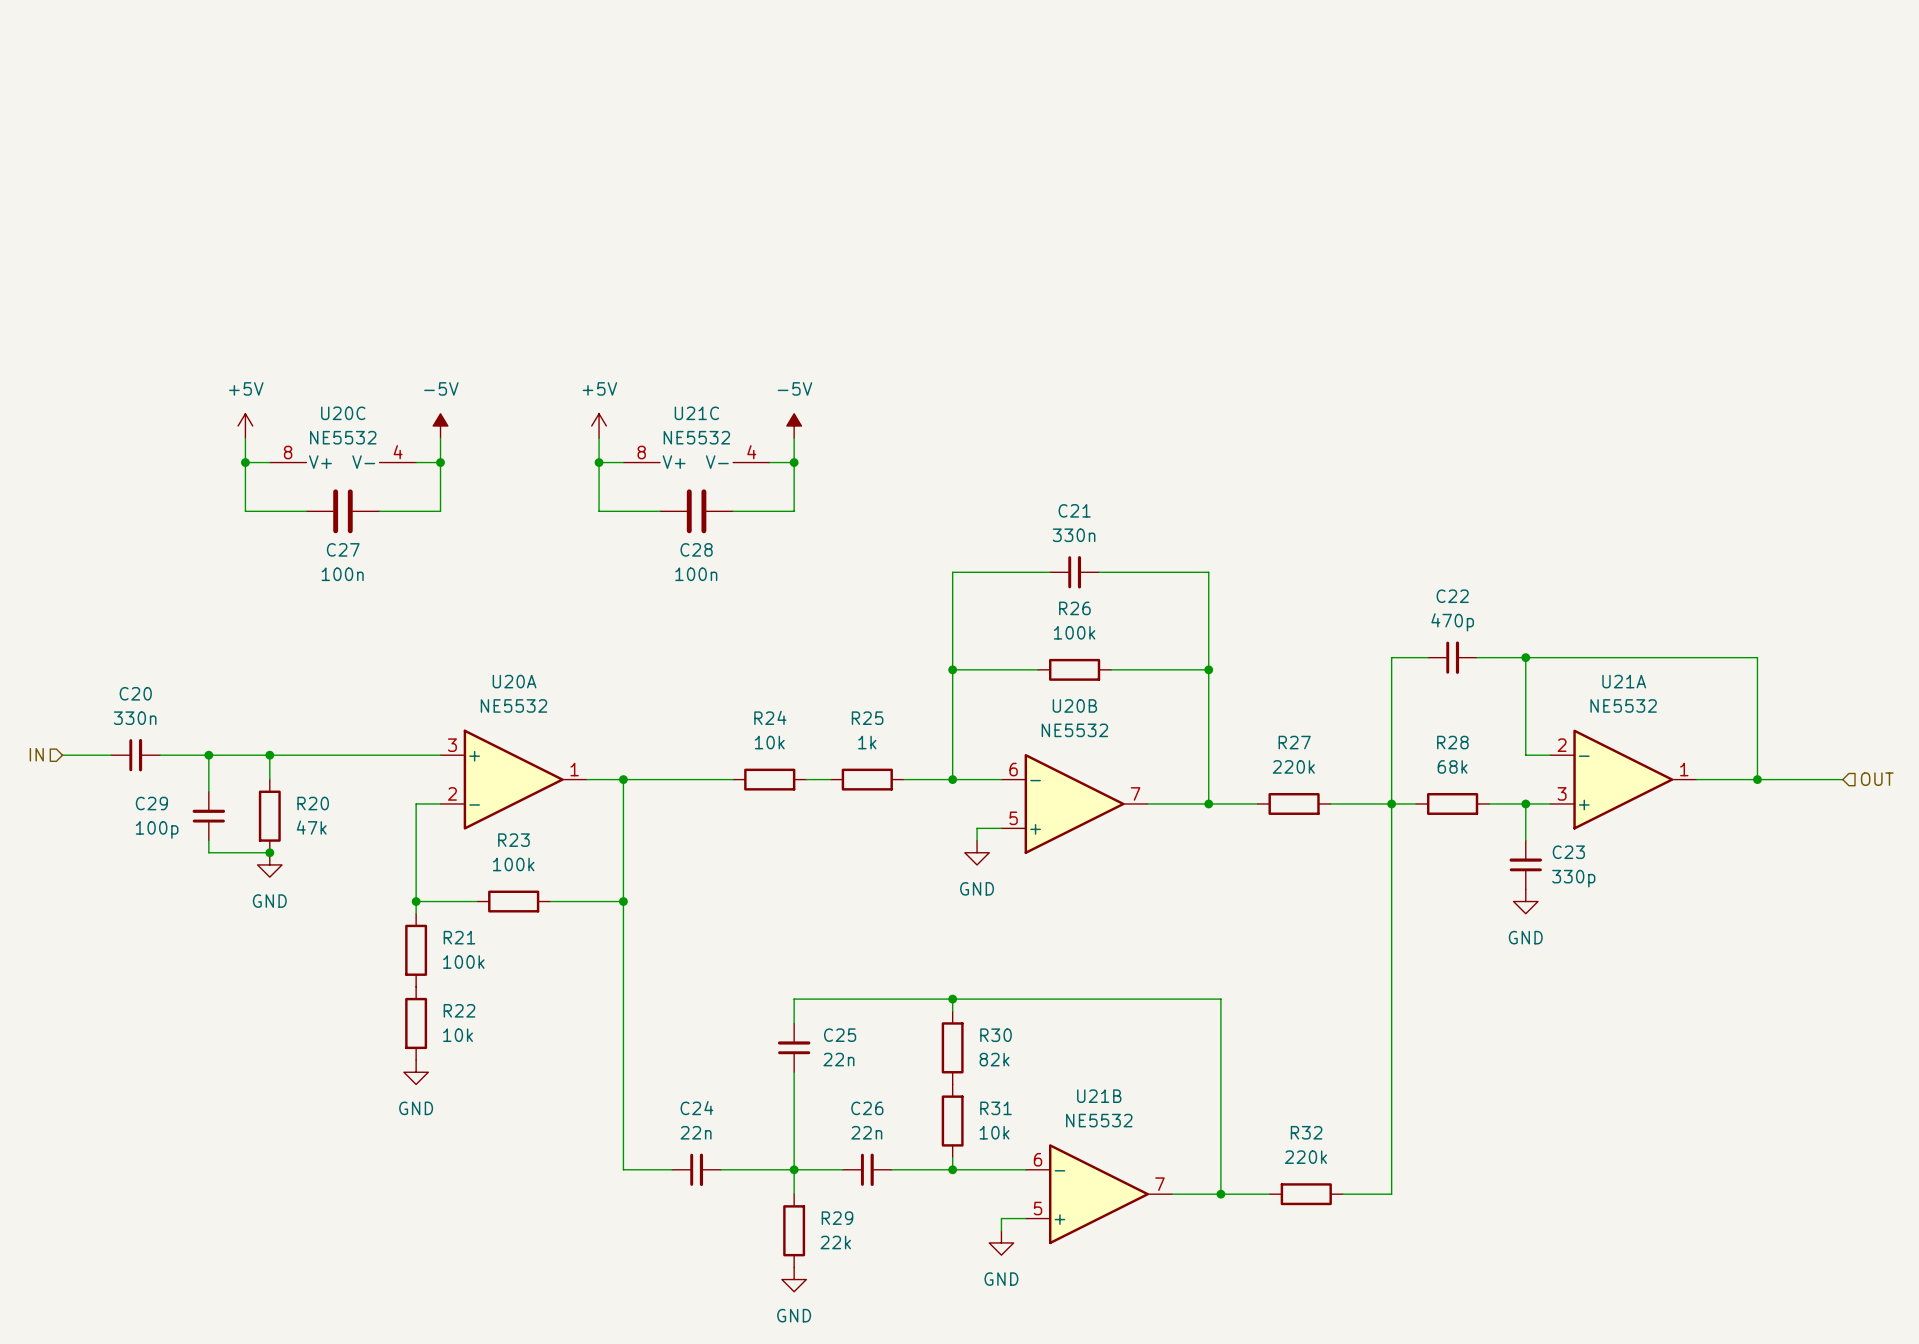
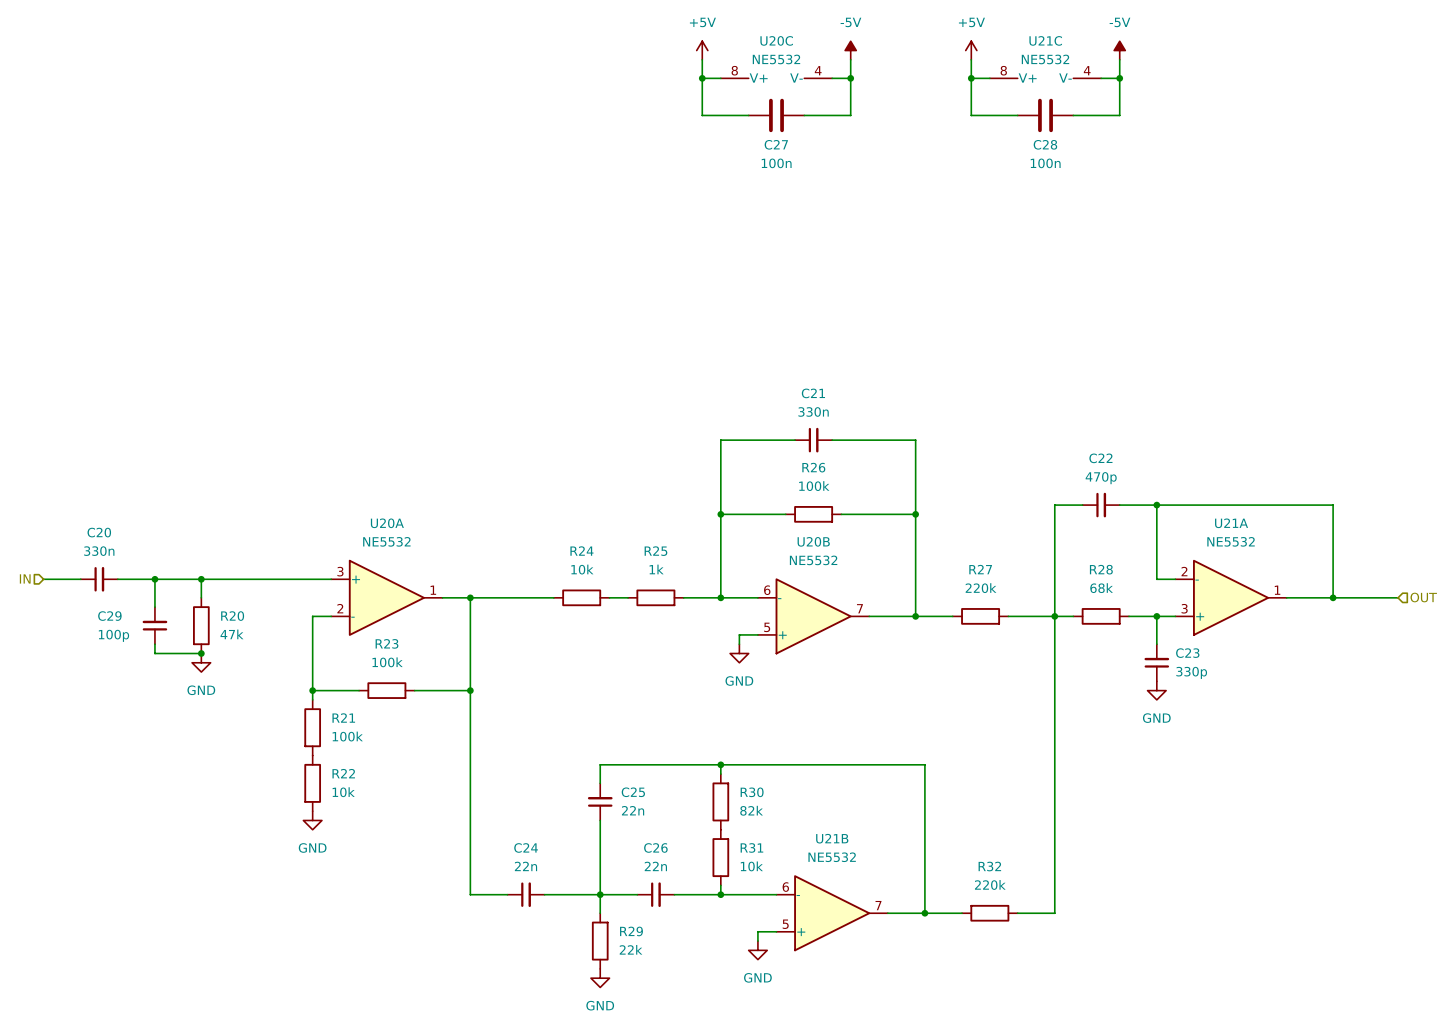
power symbol: none -> +5V (702, 50)
power symbol: none -> -5V (850, 50)
power symbol: none -> +5V (971, 50)
power symbol: none -> -5V (1119, 50)
wire: none -> (702, 59) (702, 115) (748, 115)
wire: none -> (850, 59) (850, 115) (804, 115)
wire: none -> (971, 59) (971, 115) (1017, 115)
wire: none -> (1119, 59) (1119, 115) (1073, 115)
wire: none -> (702, 78) (720, 78)
junction: none -> (702, 78)
wire: none -> (832, 78) (850, 78)
junction: none -> (850, 78)
wire: none -> (971, 78) (989, 78)
junction: none -> (971, 78)
wire: none -> (1101, 78) (1119, 78)
junction: none -> (1119, 78)
power symbol: +5V (245, 425) -> none
power symbol: -5V (440, 425) -> none
power symbol: +5V (599, 425) -> none
power symbol: -5V (794, 425) -> none
wire: (245, 438) (245, 511) (306, 511) -> none
wire: (440, 438) (440, 511) (379, 511) -> none
wire: (599, 438) (599, 511) (660, 511) -> none
wire: (794, 438) (794, 511) (733, 511) -> none
wire: (245, 462) (269, 462) -> none
junction: (245, 462) -> none
U20C position: (342, 462) -> (776, 78)
wire: (416, 462) (440, 462) -> none
junction: (440, 462) -> none
wire: (599, 462) (623, 462) -> none
junction: (599, 462) -> none
U21C position: (696, 462) -> (1045, 78)
wire: (769, 462) (794, 462) -> none
junction: (794, 462) -> none
C27 position: (342, 511) -> (776, 115)
C28 position: (696, 511) -> (1045, 115)

